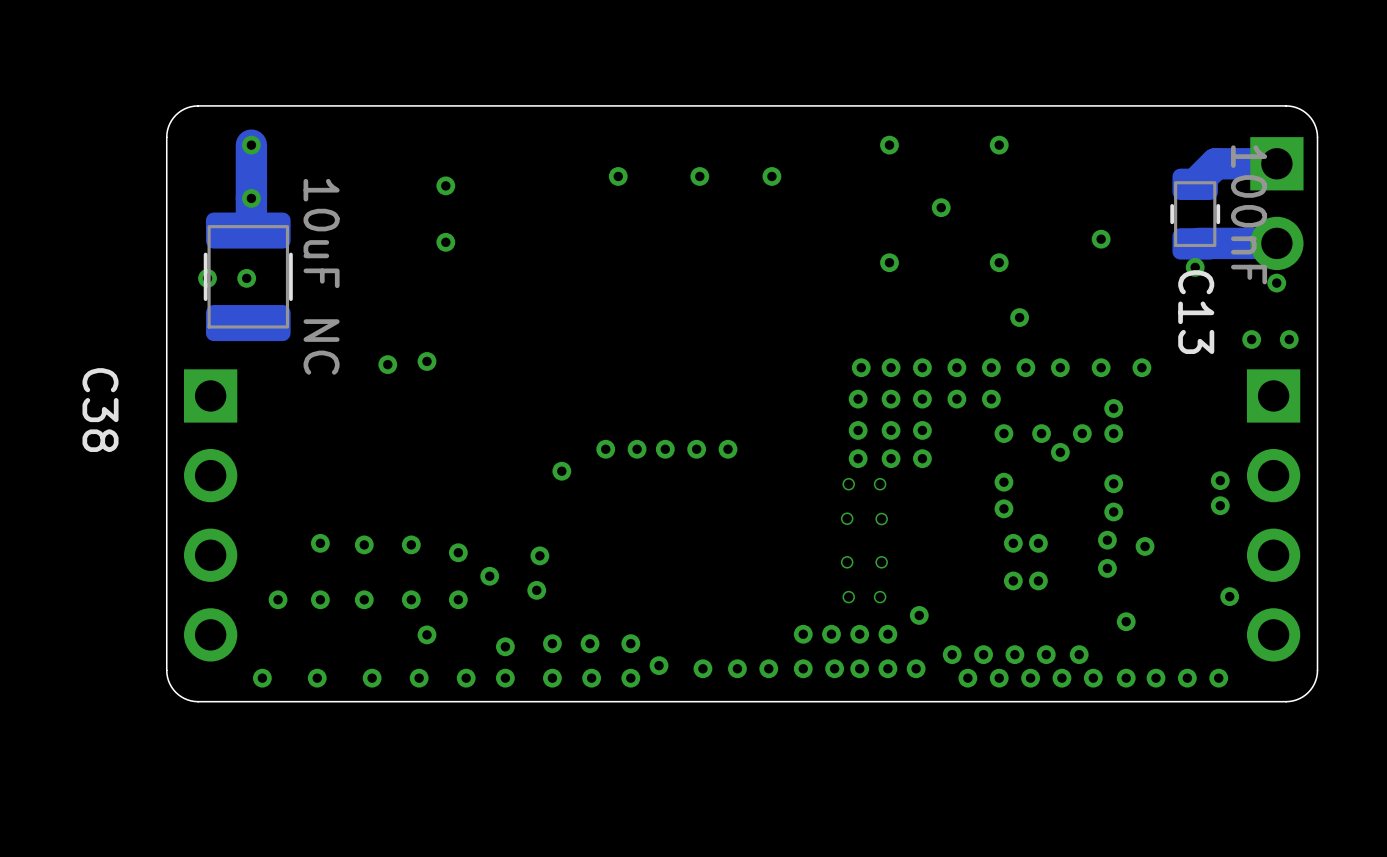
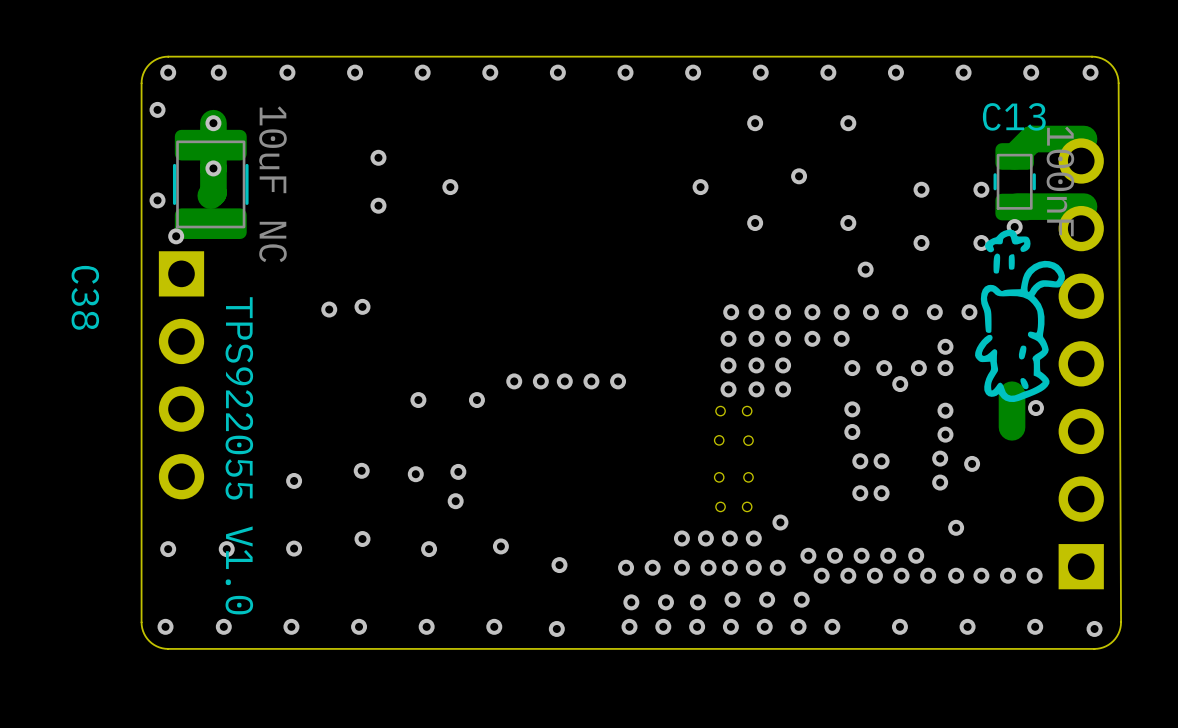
via: none -> (168, 72)
via: none -> (218, 72)
via: none -> (287, 72)
via: none -> (355, 72)
via: none -> (422, 72)
via: none -> (490, 72)
via: none -> (557, 72)
via: none -> (625, 72)
via: none -> (693, 72)
via: none -> (760, 72)
via: none -> (828, 72)
via: none -> (895, 72)
via: none -> (963, 72)
via: none -> (1031, 72)
via: none -> (1090, 72)
via: none -> (157, 109)
board edge: (166, 137) (168, 126) (175, 115) (184, 109) (198, 105) (1286, 105) (1296, 107) (1308, 115) (1314, 123) (1317, 137) (1317, 670) (1312, 687) (1299, 698) (1286, 701) (198, 701) (184, 698) (175, 692) (168, 680) (166, 670) -> (141, 116) (143, 74) (151, 62) (165, 56) (1092, 56) (1105, 60) (1115, 69) (1118, 83) (1120, 625) (1118, 633) (1113, 641) (1103, 647) (1094, 648) (165, 648) (151, 643) (143, 631) (141, 569)
via: (618, 176) -> none
via: (699, 176) -> none
via: (771, 176) -> none
part: (1276, 203) -> none
via: none -> (450, 187)
via: none -> (700, 187)
via: none -> (981, 189)
via position: (1101, 239) -> (921, 189)
drawing: none -> [975, 229, 1065, 403]
C38 position: (248, 276) -> (210, 184)
via position: (246, 278) -> (157, 200)
via: (1276, 283) -> none
via: none -> (921, 242)
via: none -> (981, 242)
C13 name rotation: 0° (1196, 312) -> 90° counterclockwise (1014, 116)
C13 name position: C13 (1196, 312) -> C13 (1014, 116)
via: (1251, 339) -> none
via: (1289, 339) -> none
part: none -> (1081, 363)
track: none -> (1012, 394) (1012, 427)
via: none -> (418, 400)
via: (1220, 505) -> none
part position: (210, 515) -> (181, 375)
part: (1273, 515) -> none
via: (320, 543) -> none
via: (364, 544) -> none
via position: (411, 544) -> (361, 470)
text: none -> TPS922055 V1.0 (239, 455)
via: (458, 552) -> none
via: none -> (294, 480)
via position: (489, 576) -> (415, 474)
via: (1229, 596) -> none
via: (278, 599) -> none
via: (320, 599) -> none
via: (364, 599) -> none
via: (411, 599) -> none
via: (458, 599) -> none
via: (552, 643) -> none
via: (630, 643) -> none
via: none -> (168, 549)
via: none -> (226, 549)
via: none -> (294, 548)
via: (702, 668) -> none
via: (262, 678) -> none
via: (317, 678) -> none
via: (372, 678) -> none
via: (419, 678) -> none
via: (466, 678) -> none
via: (505, 678) -> none
via: (552, 678) -> none
via: (591, 678) -> none
via: (630, 678) -> none
via: none -> (732, 599)
via: none -> (767, 599)
via: none -> (801, 599)
via: none -> (631, 602)
via: none -> (665, 602)
via: none -> (697, 602)
via: none -> (165, 626)
via: none -> (223, 626)
via: none -> (291, 626)
via: none -> (359, 626)
via: none -> (426, 626)
via: none -> (494, 626)
via: none -> (629, 626)
via: none -> (663, 626)
via: none -> (697, 626)
via: none -> (730, 626)
via: none -> (764, 626)
via: none -> (798, 626)
via: none -> (832, 626)
via: none -> (899, 626)
via: none -> (967, 626)
via: none -> (1035, 626)
via: none -> (556, 628)
via: none -> (1094, 628)

